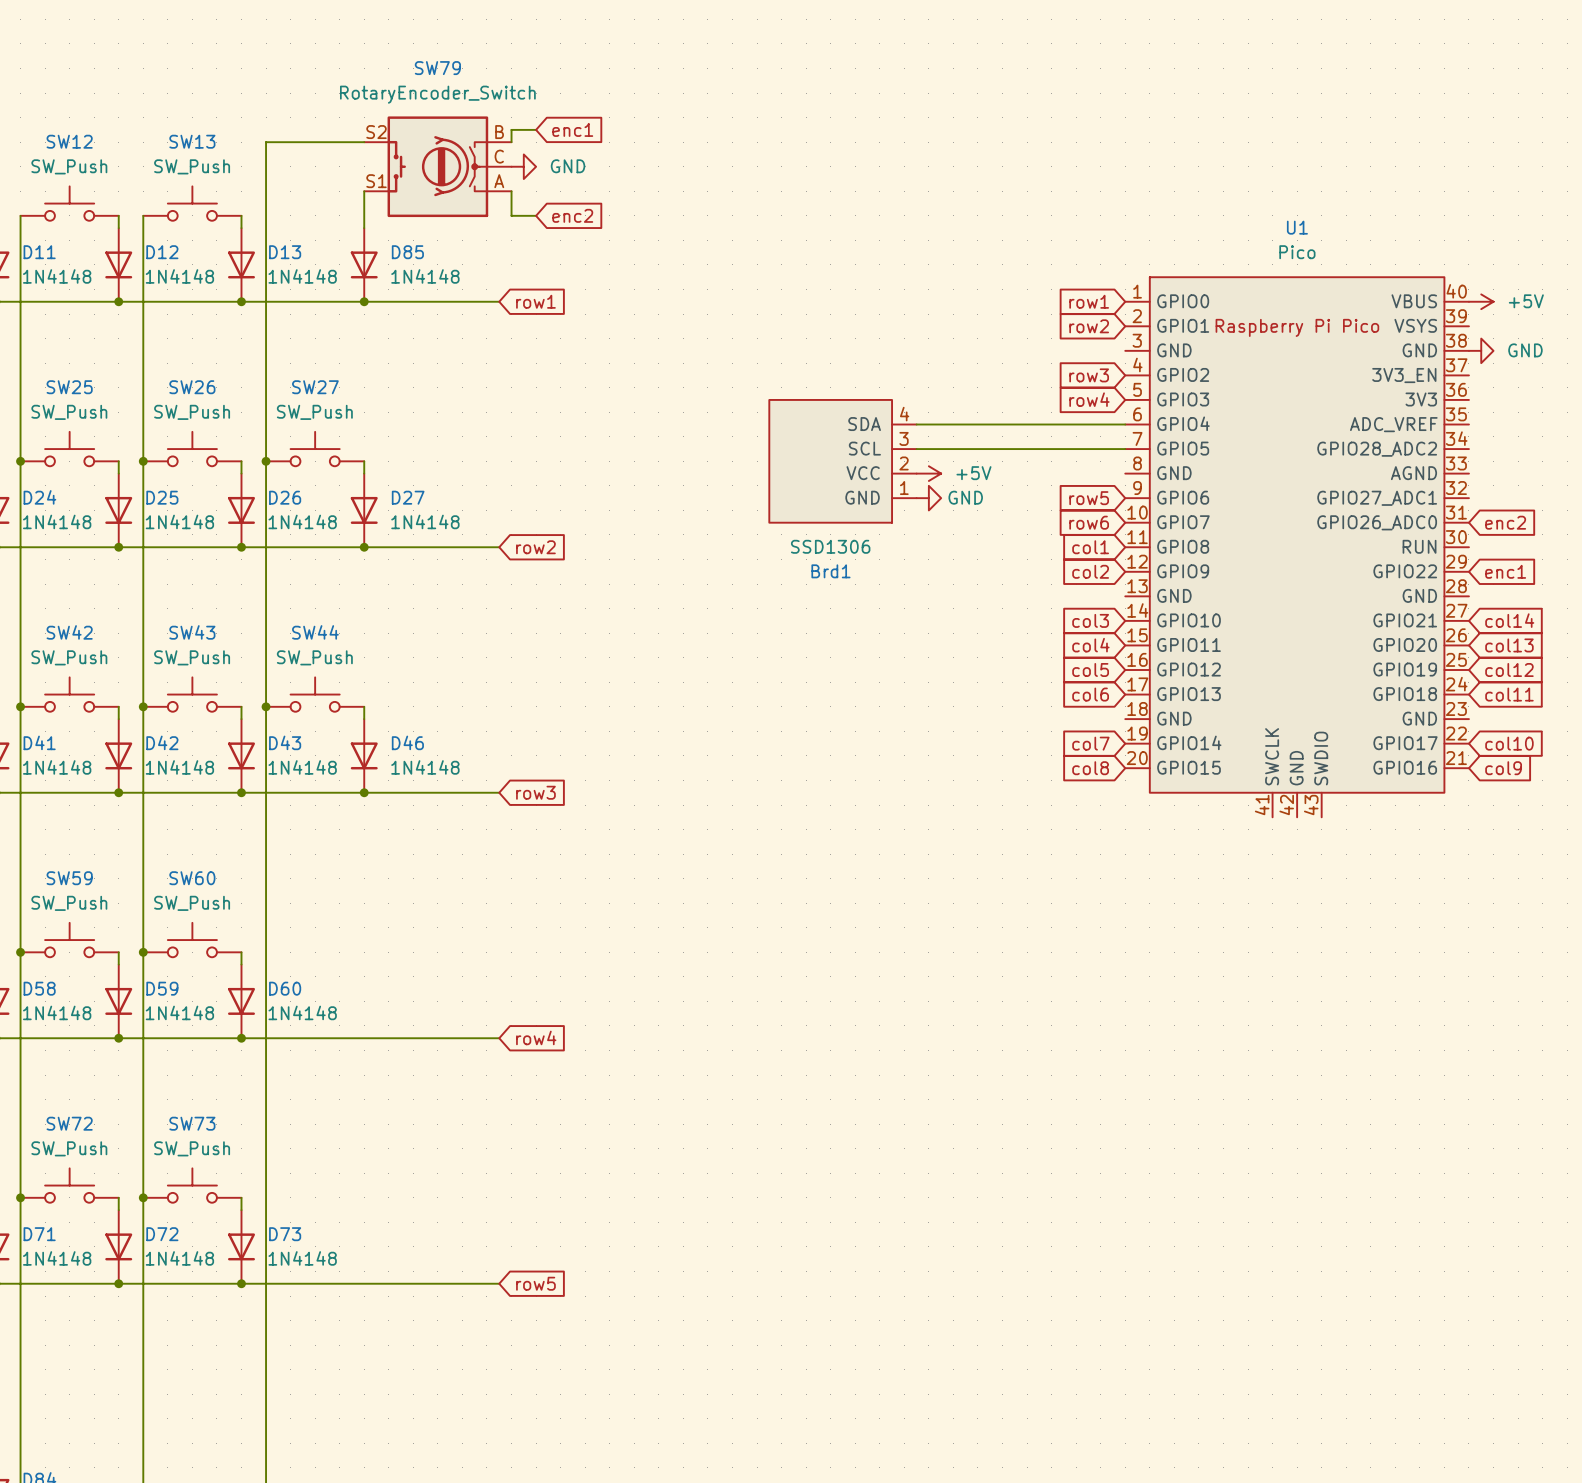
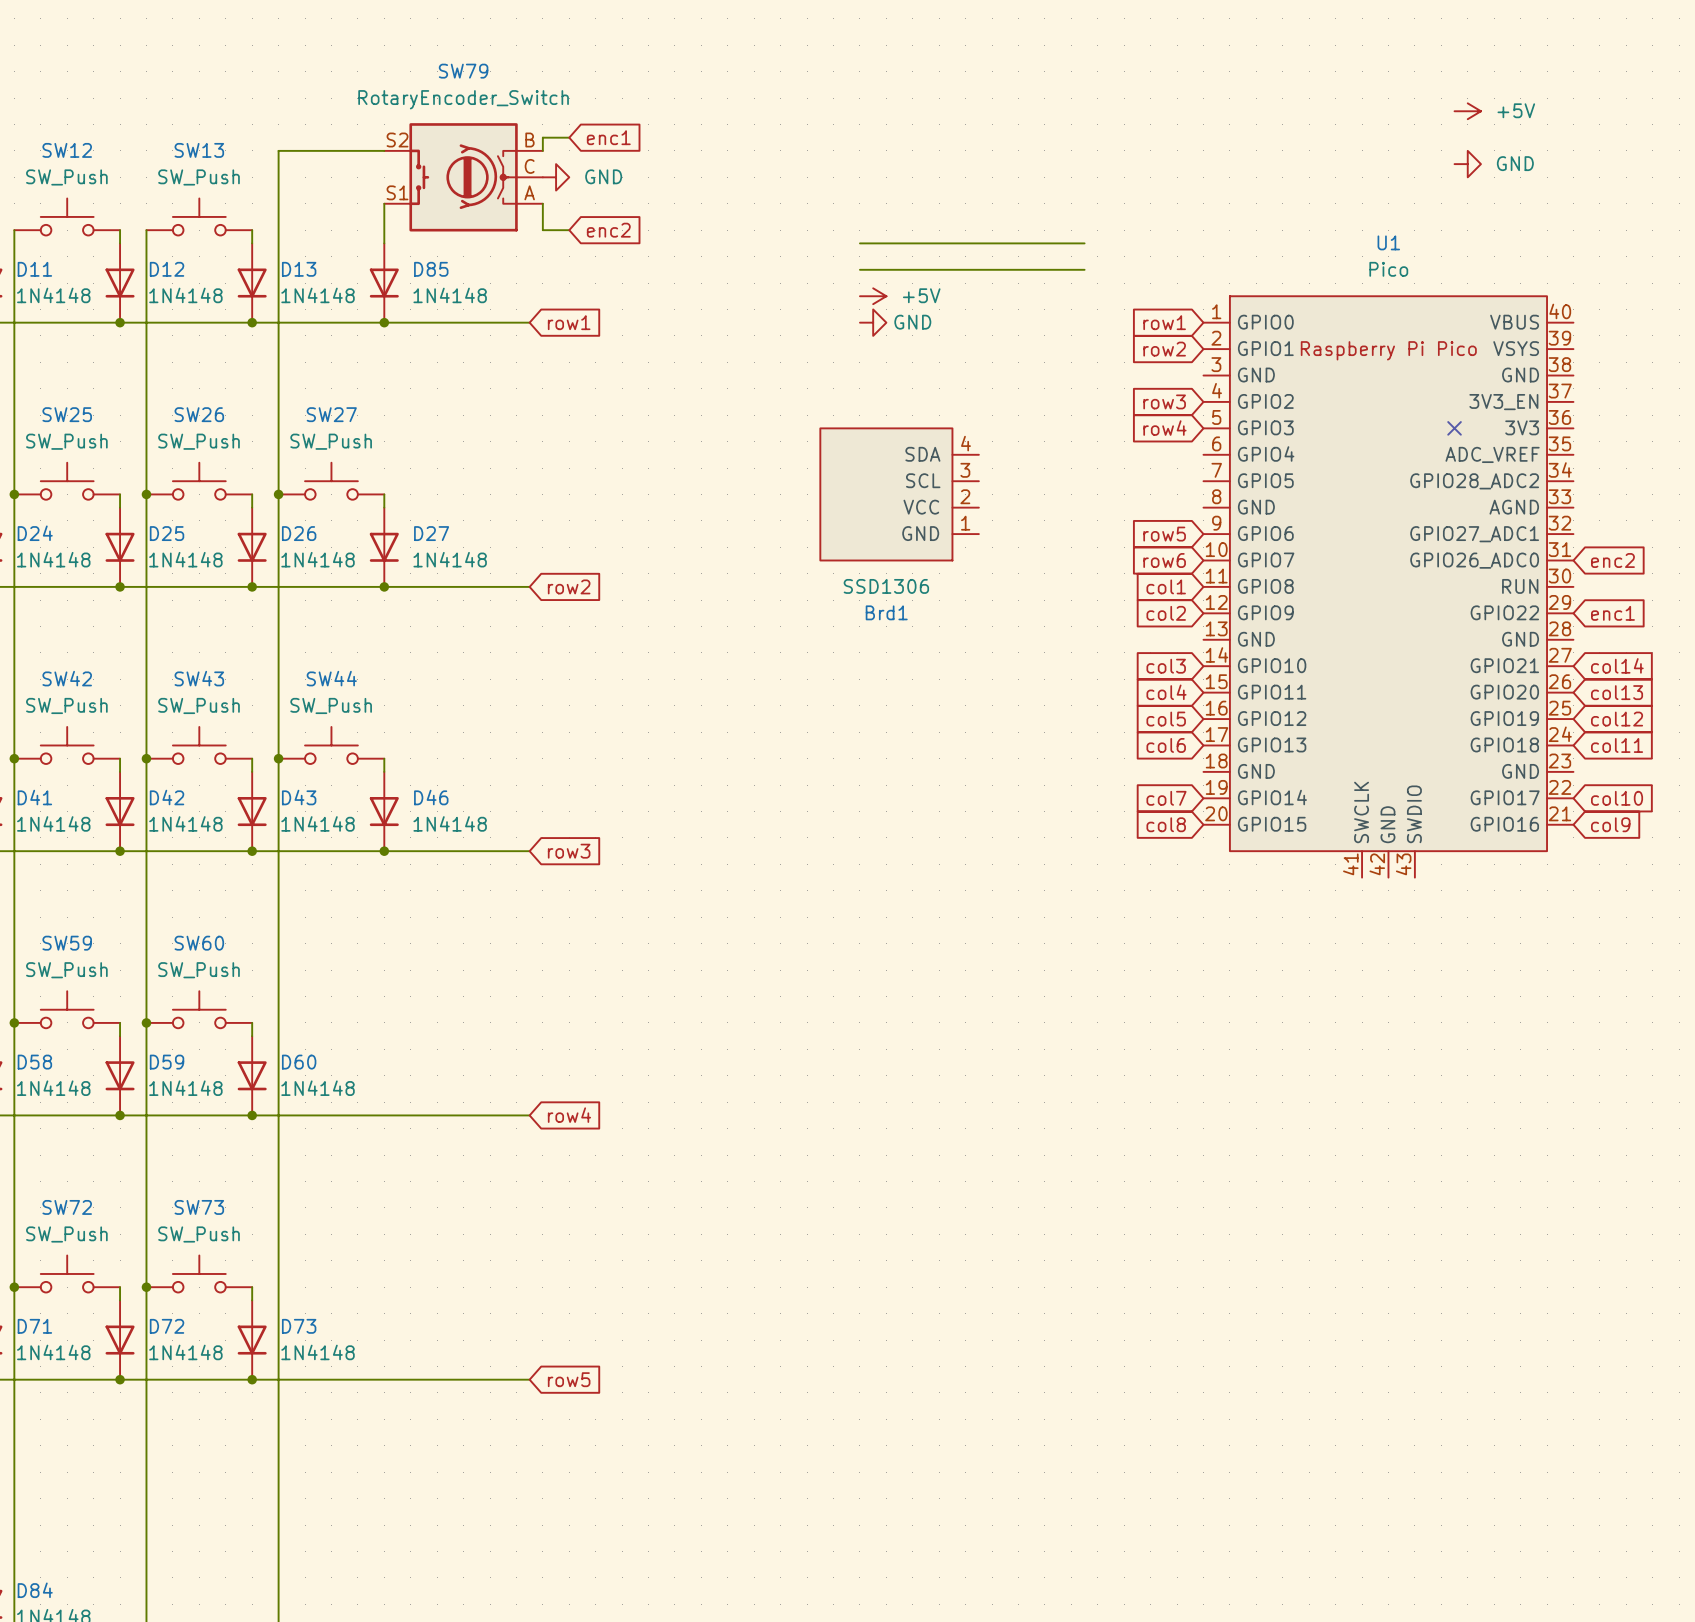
power symbol position: +5V (1481, 301) -> +5V (1467, 111)
power symbol position: GND (1481, 350) -> GND (1467, 164)
no-connect mark: none -> (1454, 428)
wire: (916, 424) (1125, 424) -> (859, 243) (1084, 243)
wire: (916, 449) (1125, 449) -> (859, 269) (1084, 269)
power symbol position: +5V (928, 473) -> +5V (873, 296)
power symbol position: GND (928, 498) -> GND (873, 322)

